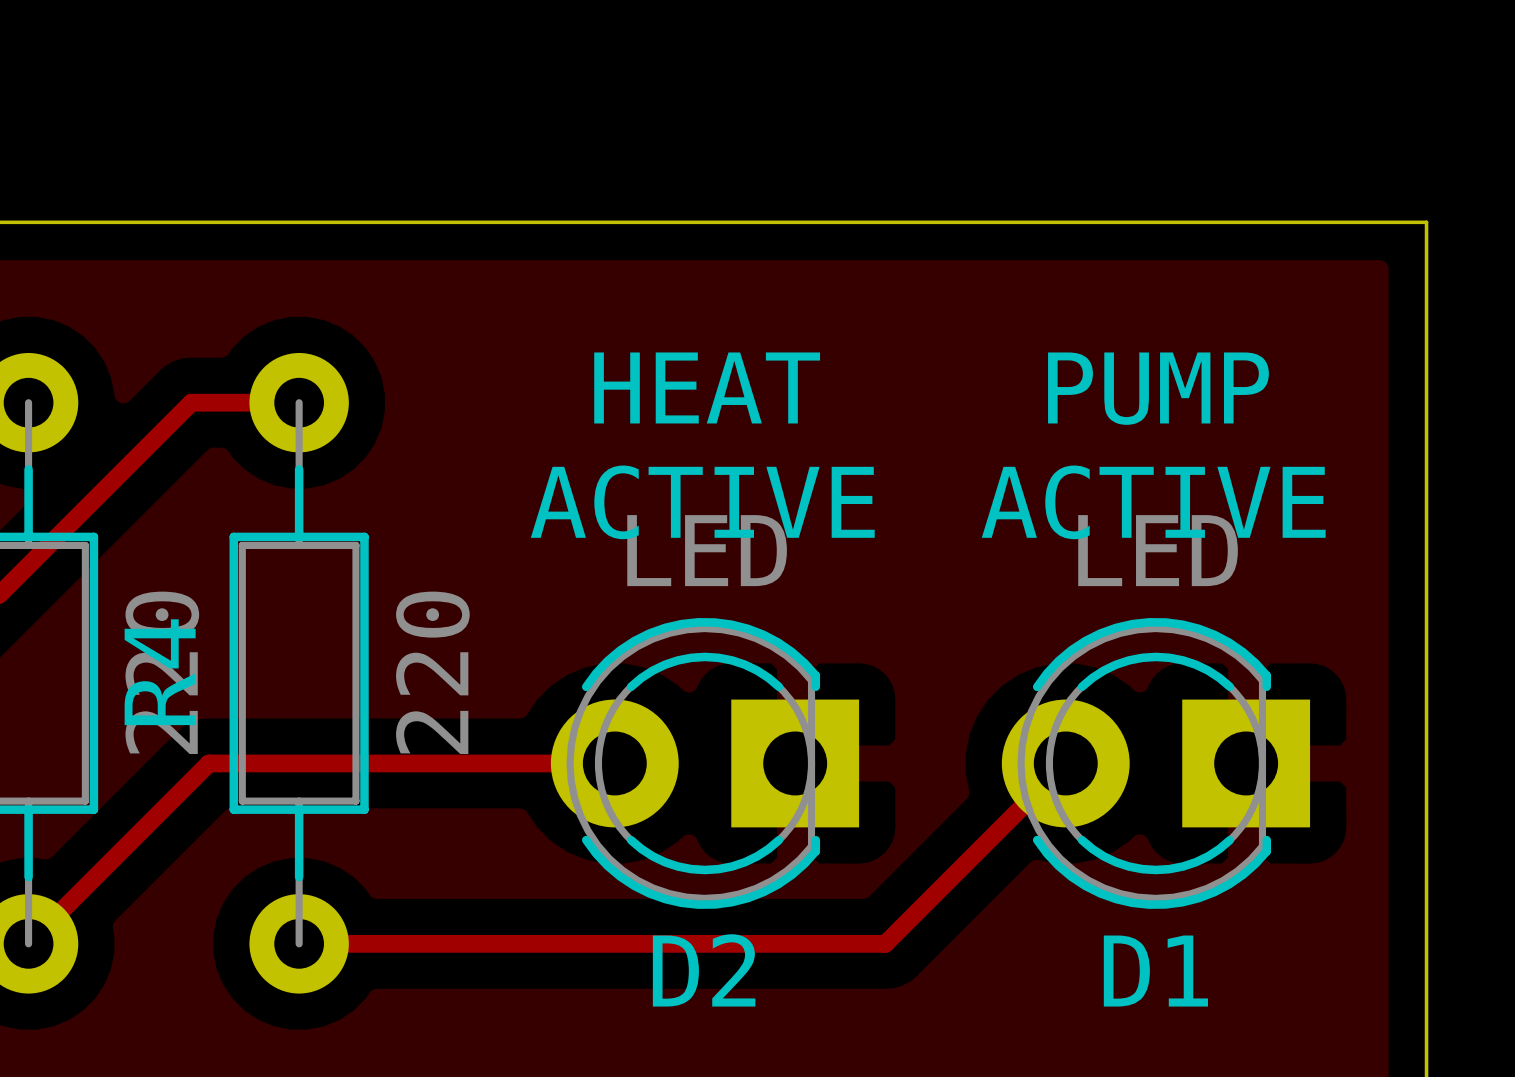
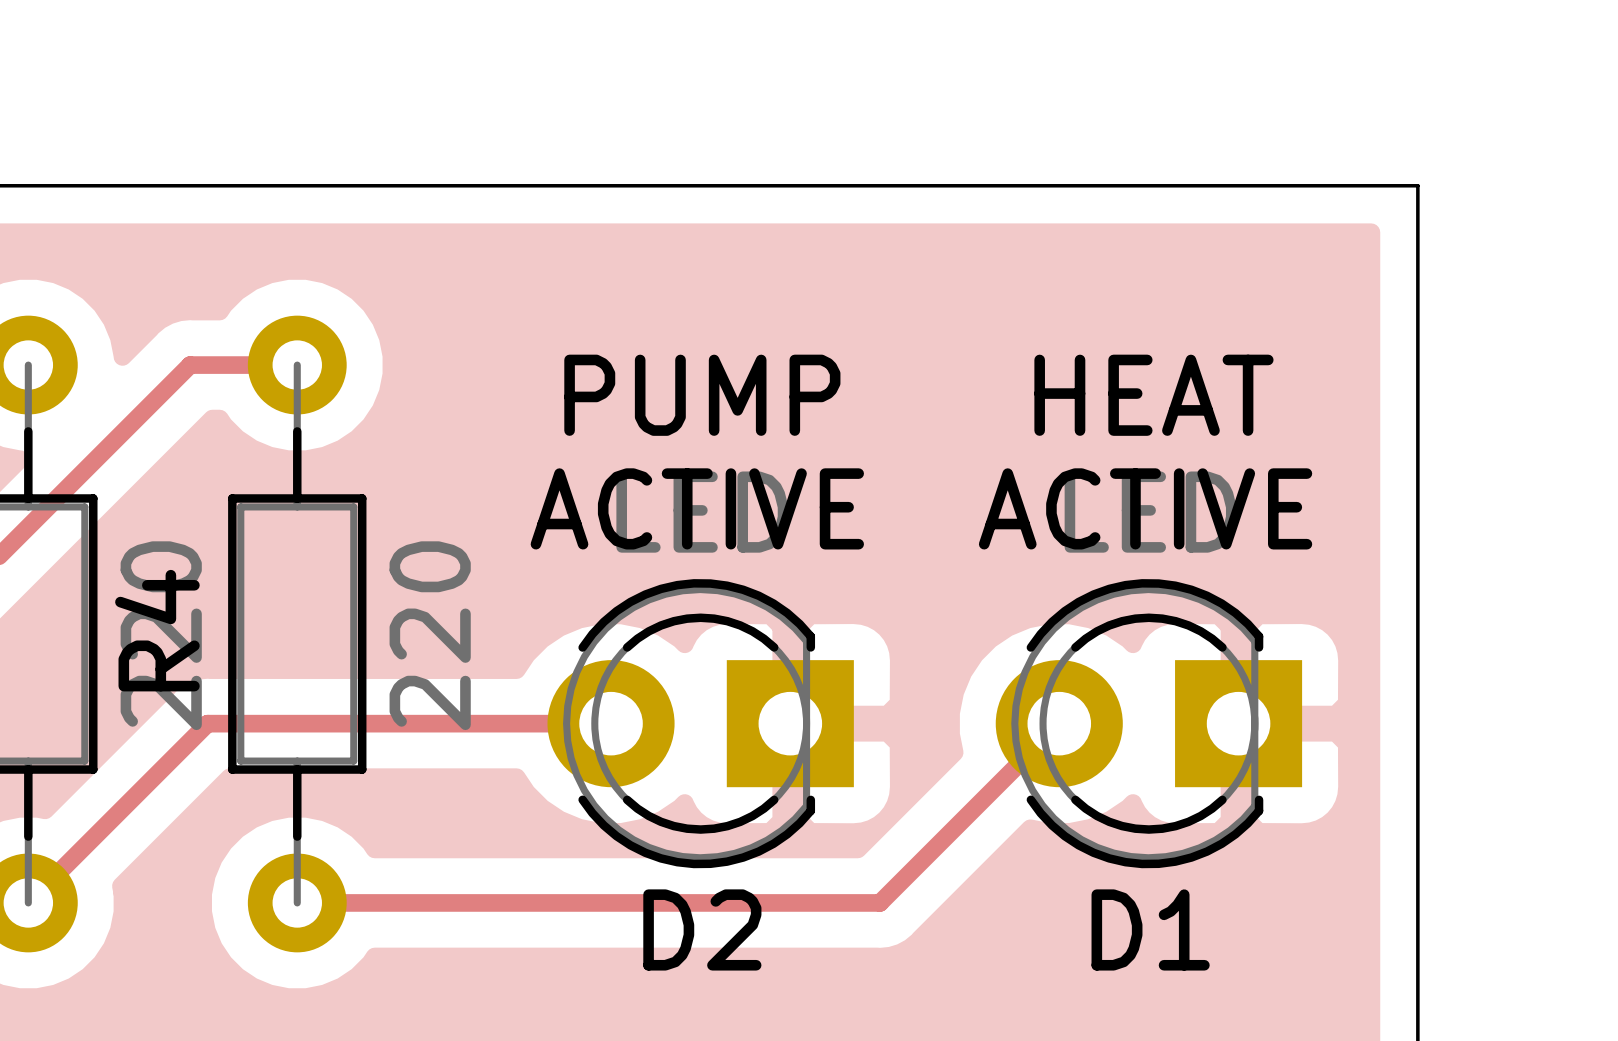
text position: HEAT (707, 387) -> HEAT (1153, 395)
text position: PUMP (1158, 388) -> PUMP (702, 395)
text position: ACTIVE (702, 502) -> ACTIVE (697, 508)
text position: ACTIVE (1153, 502) -> ACTIVE (1145, 508)

